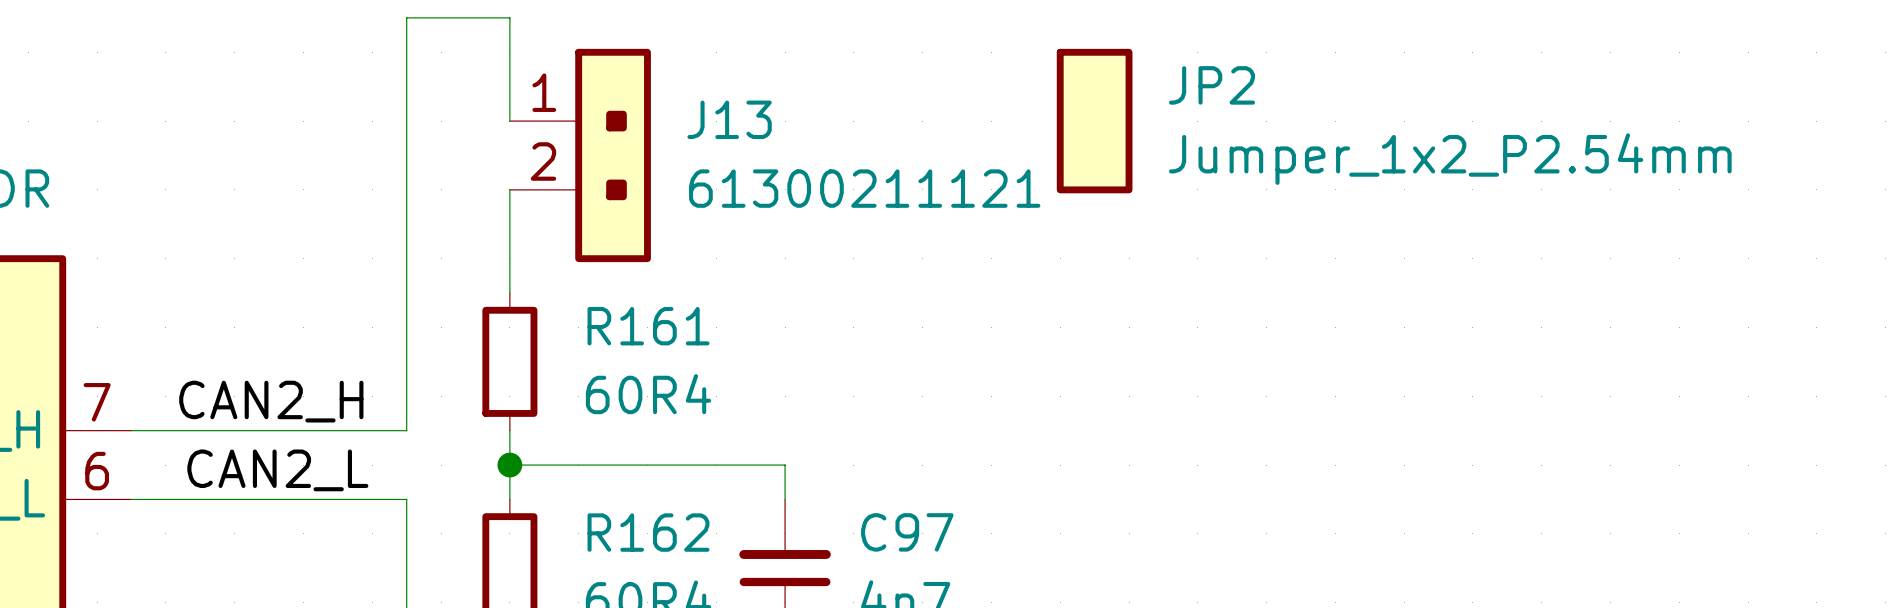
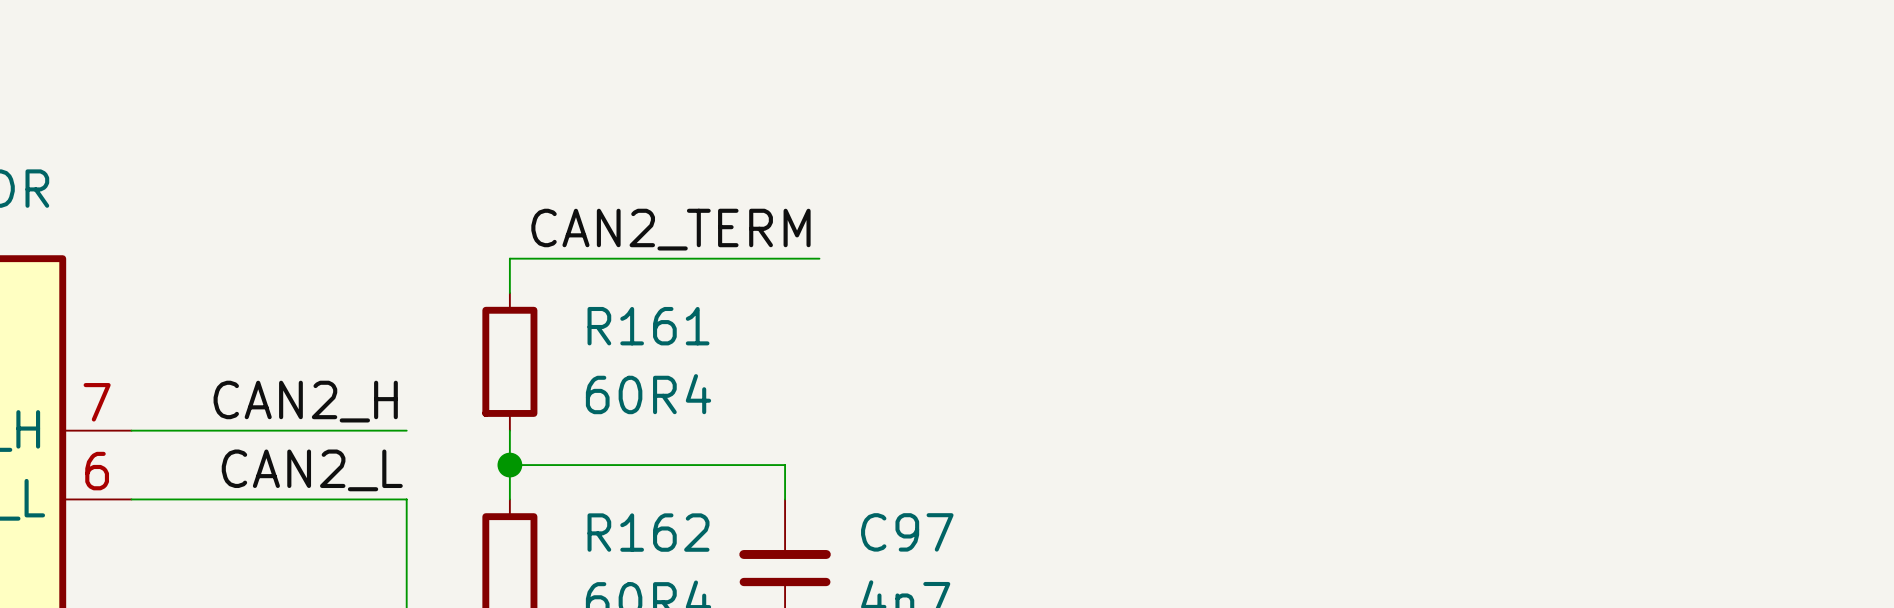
wire: (509, 121) (509, 17) (406, 17) (406, 430) -> none
JP2: Jumper_1x2_P2.54mm (1094, 121) -> none
J13: (580, 155) -> none
wire: (509, 189) (509, 258) -> (819, 258) (509, 258)
label: none -> CAN2_TERM (670, 229)
label position: CAN2_H (271, 401) -> CAN2_H (305, 401)
label position: CAN2_L (277, 470) -> CAN2_L (312, 470)

